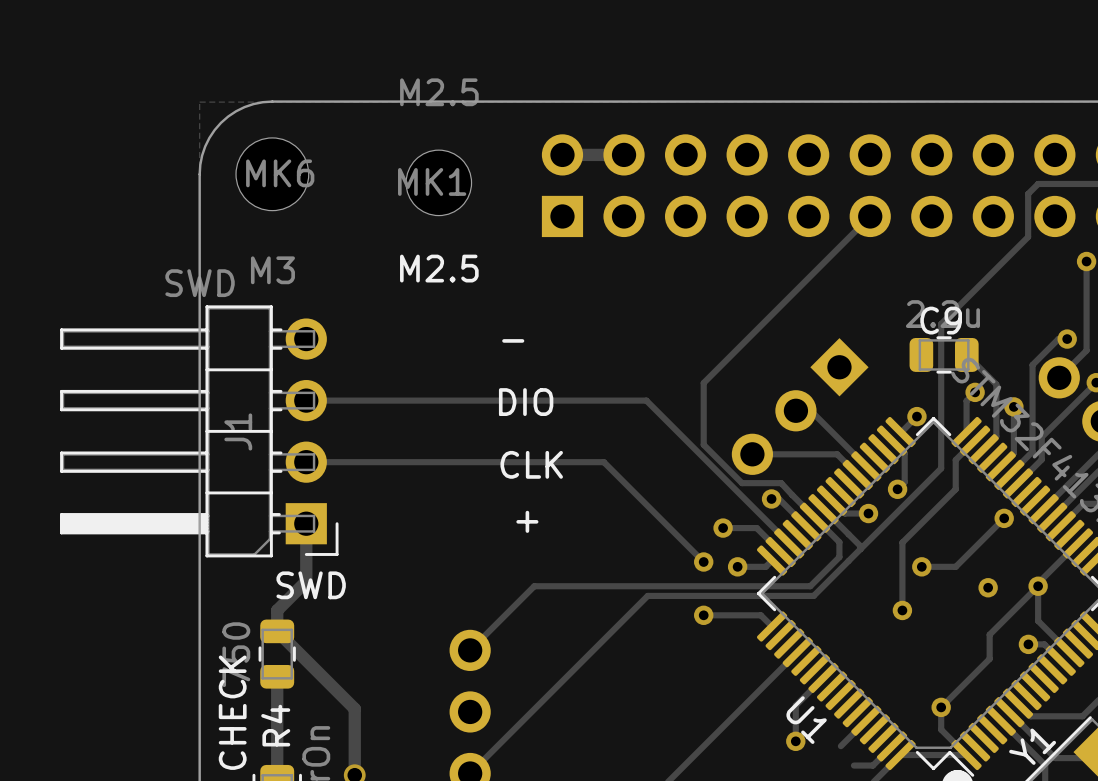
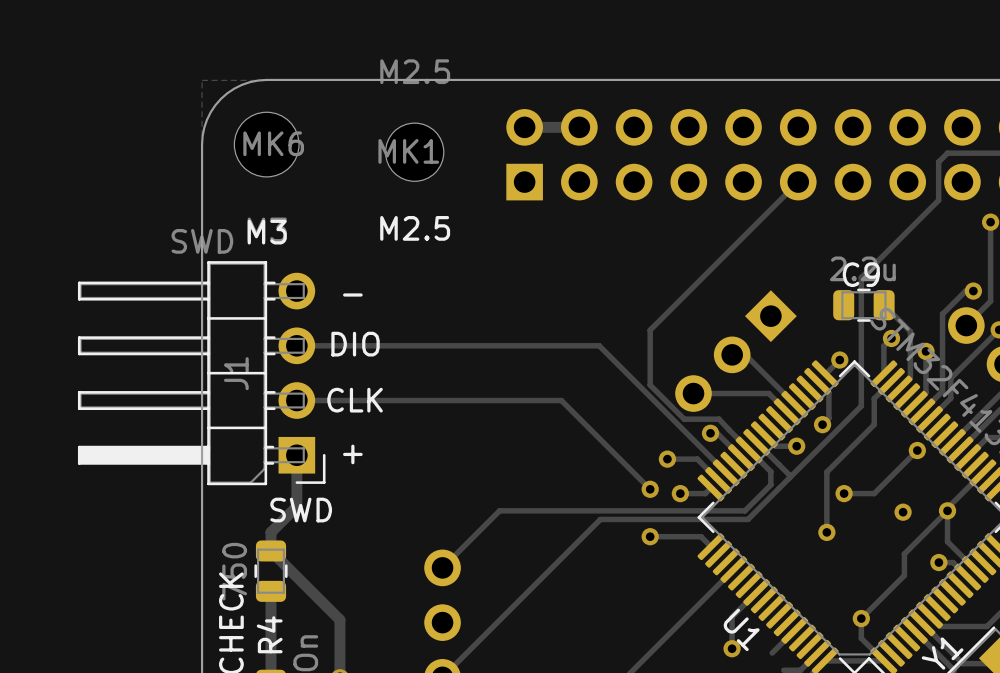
text: none -> M3 (267, 232)
text position: - (513, 340) -> - (352, 294)
text position: DIO (526, 402) -> DIO (355, 344)
text position: CLK (531, 464) -> CLK (355, 400)
text position: + (527, 521) -> + (352, 454)

